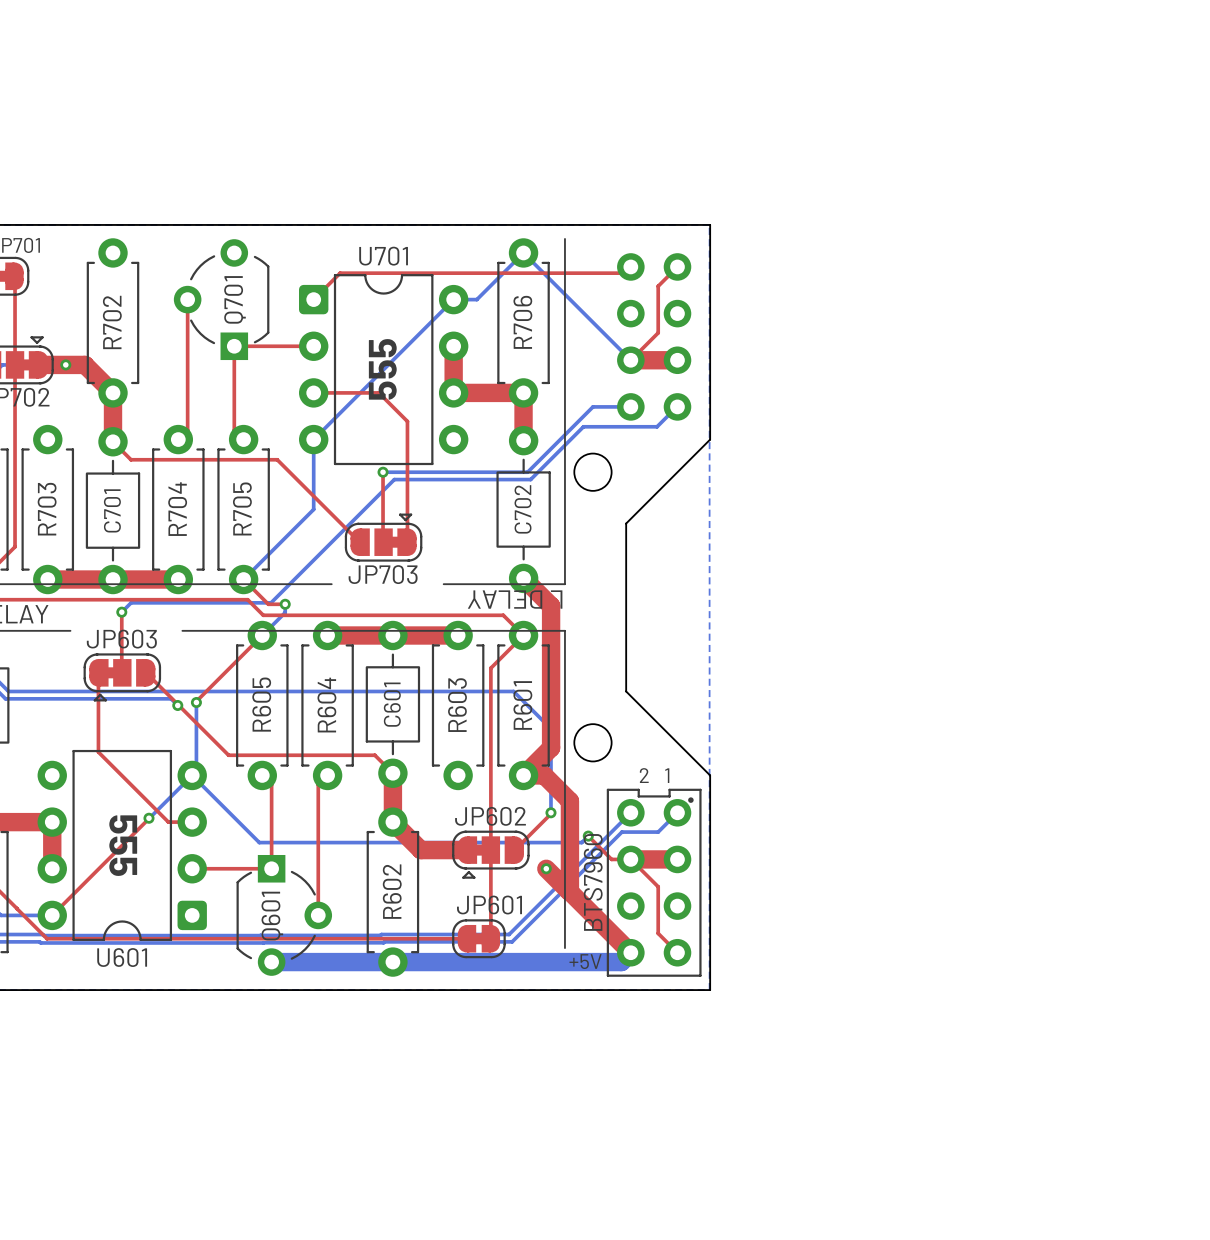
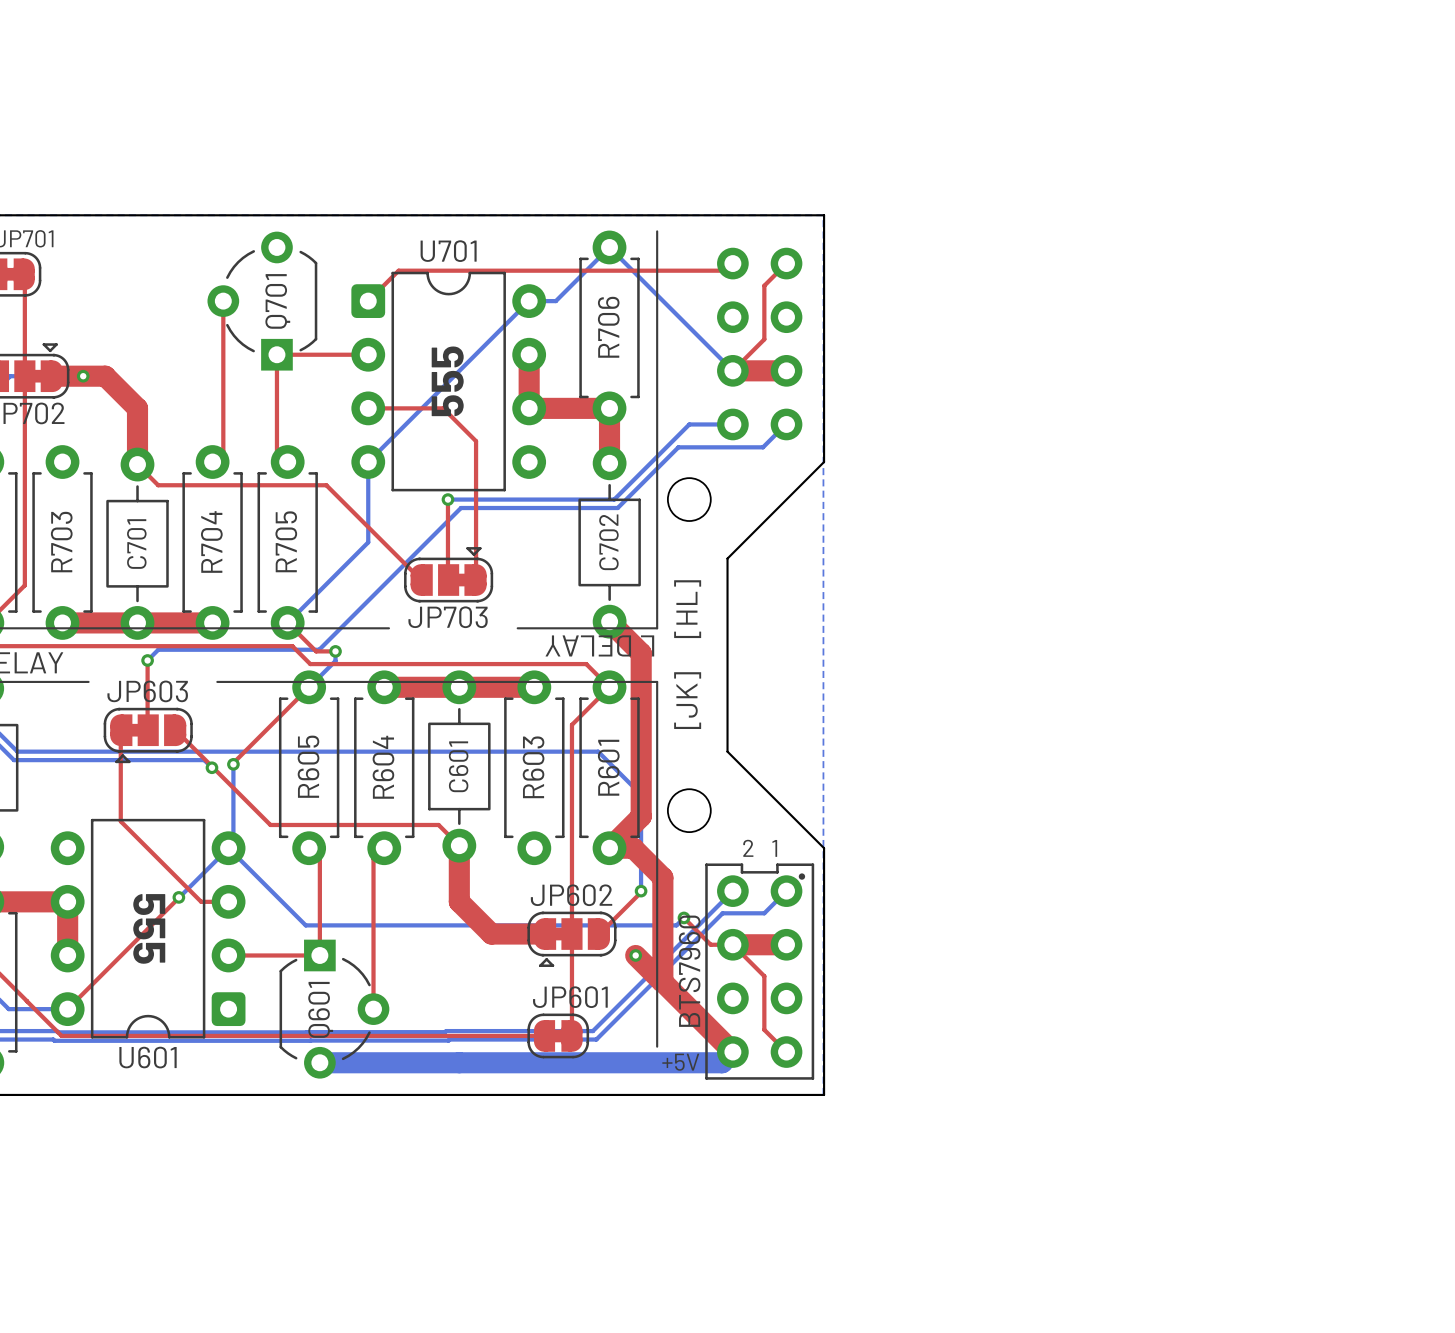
R702: (113, 322) -> none
text: none -> [HL] (687, 609)
text: none -> [JK] (687, 700)
R602: (392, 892) -> none

